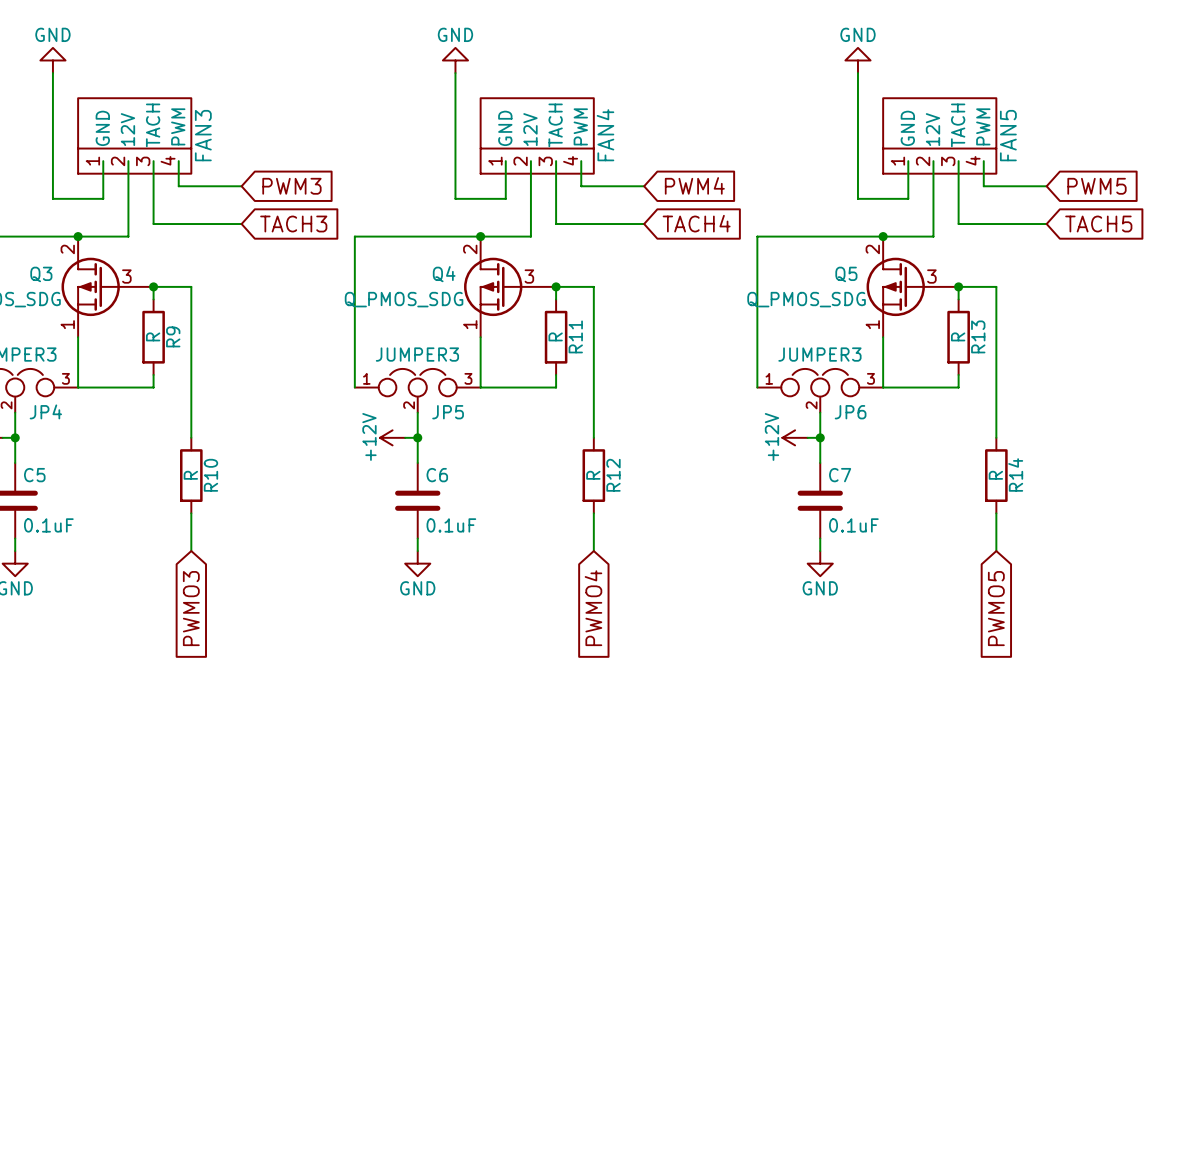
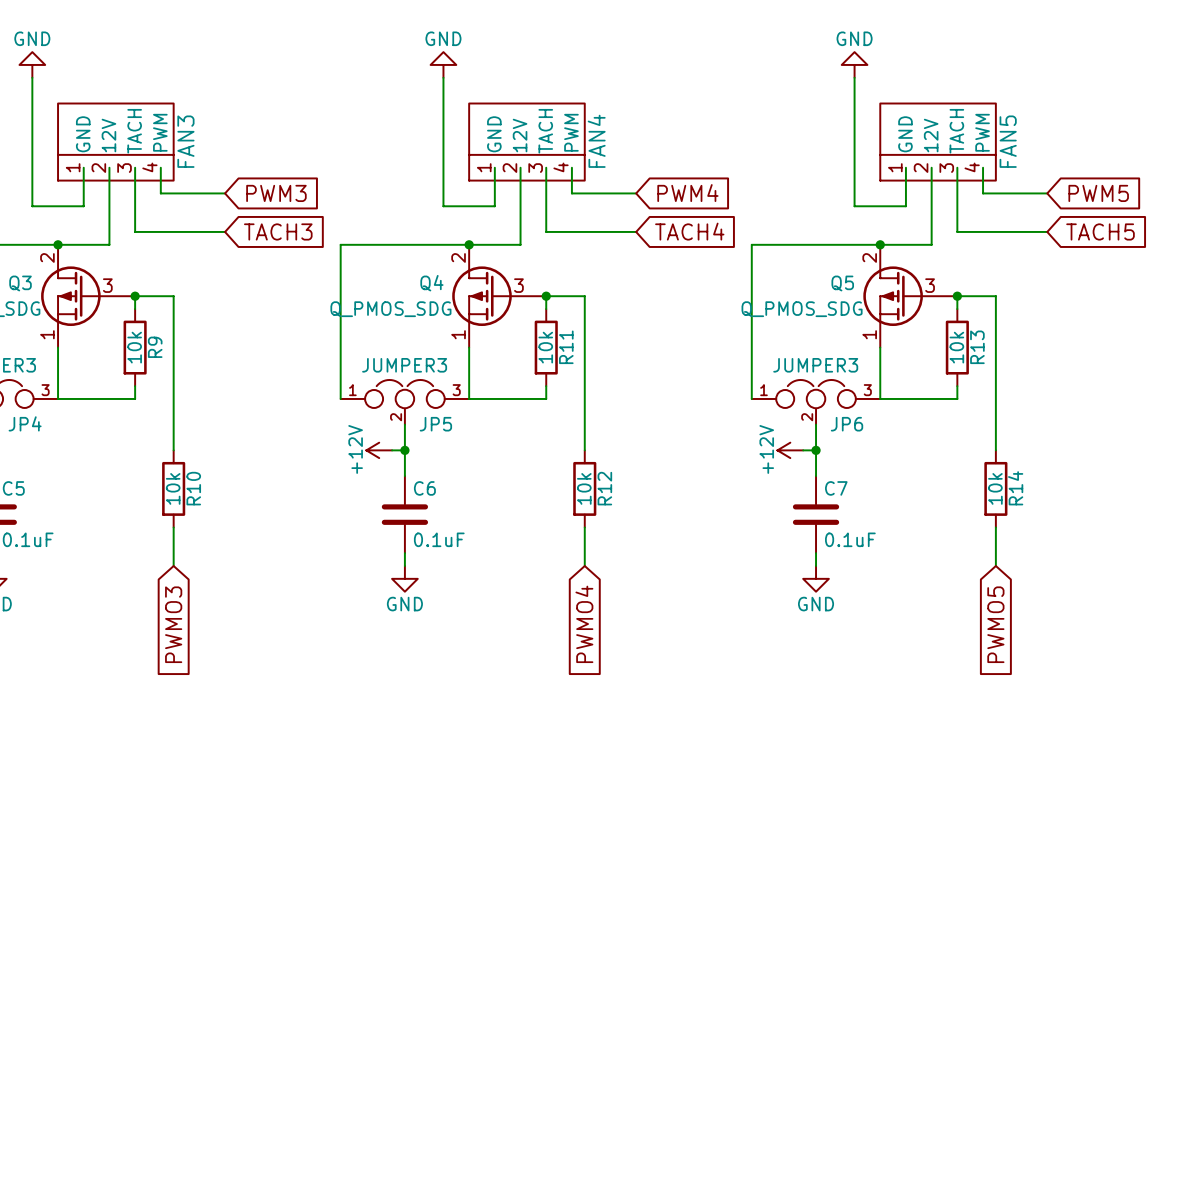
R9 value: R (153, 336) -> 10k (134, 347)
R11 value: R (555, 336) -> 10k (545, 347)
R13 value: R (958, 336) -> 10k (956, 347)
R10 value: R (190, 475) -> 10k (173, 488)
R12 value: R (593, 475) -> 10k (584, 488)
R14 value: R (995, 475) -> 10k (995, 488)

